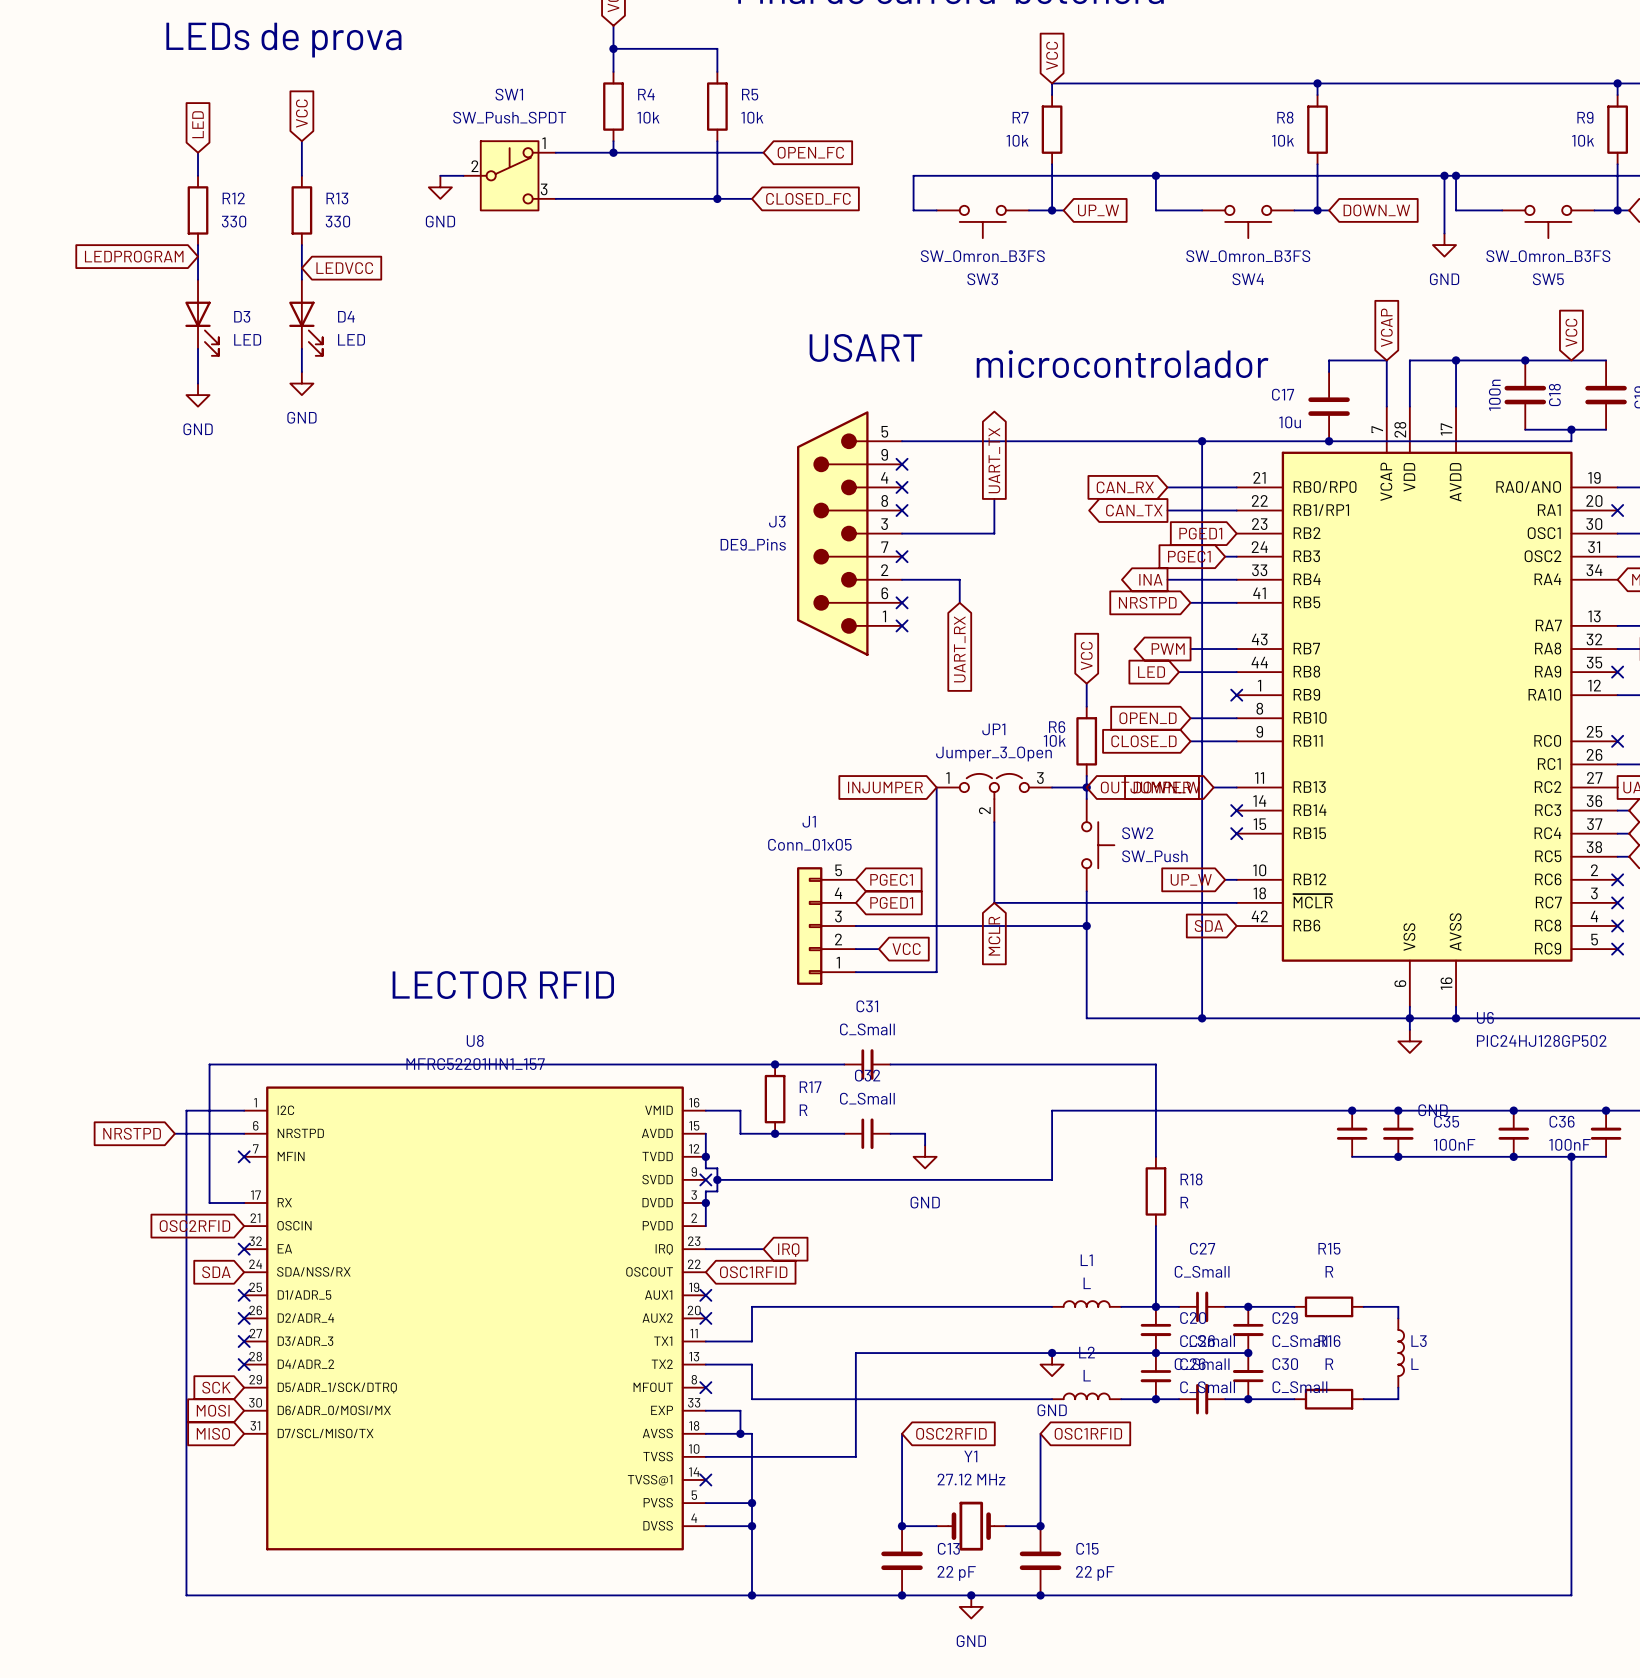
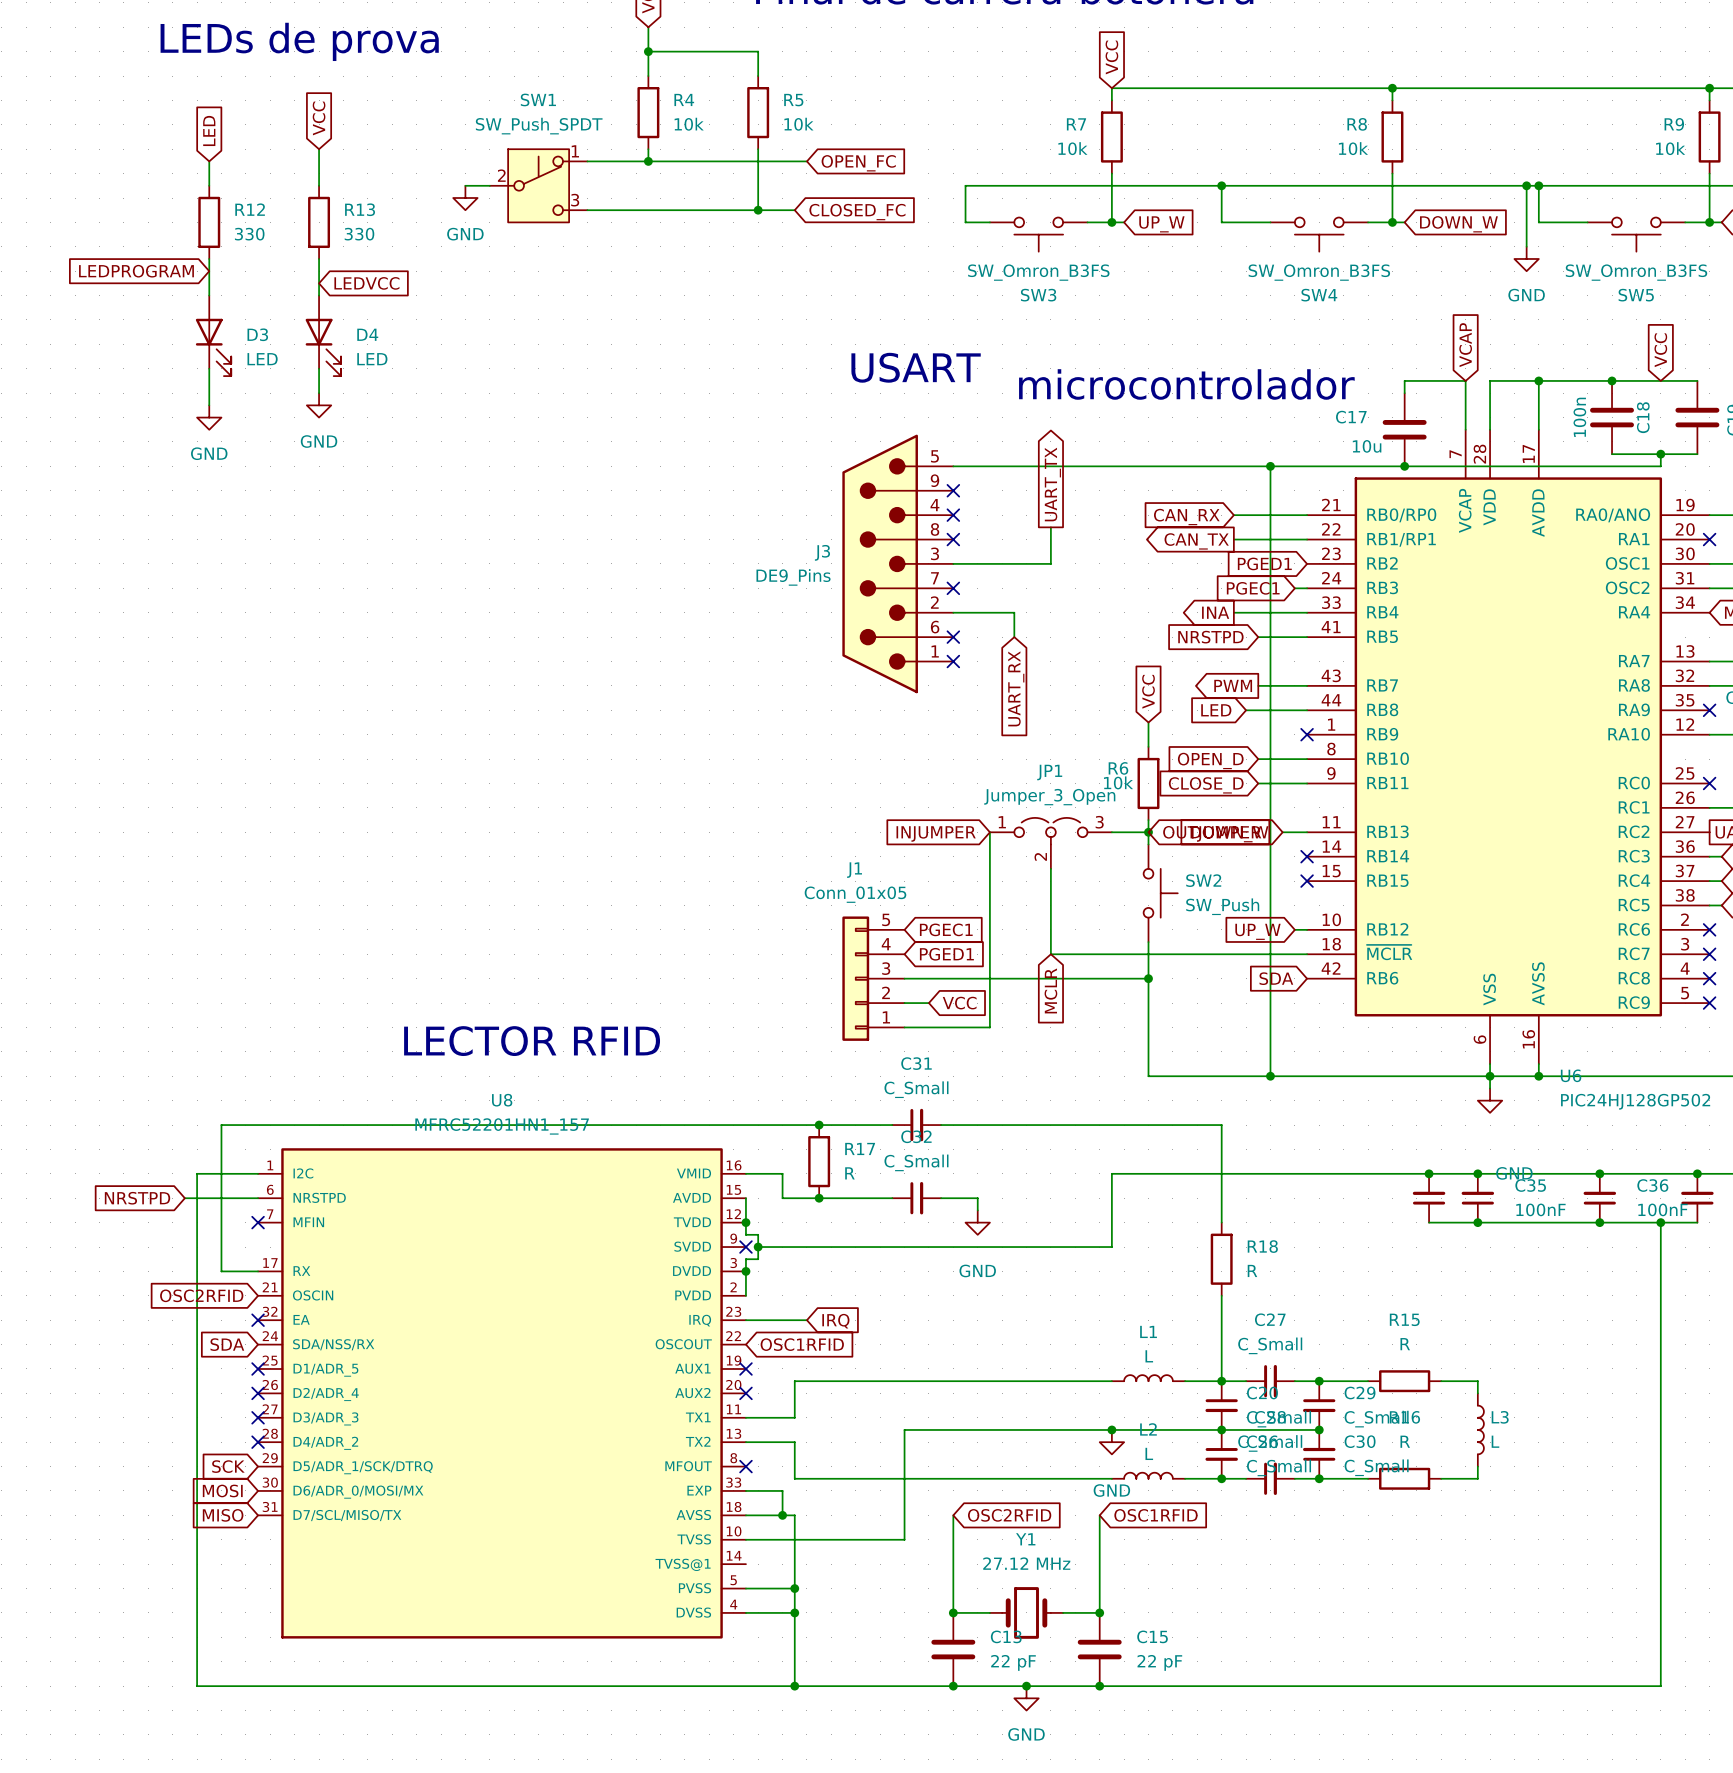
no-connect mark: (705, 1479) -> none

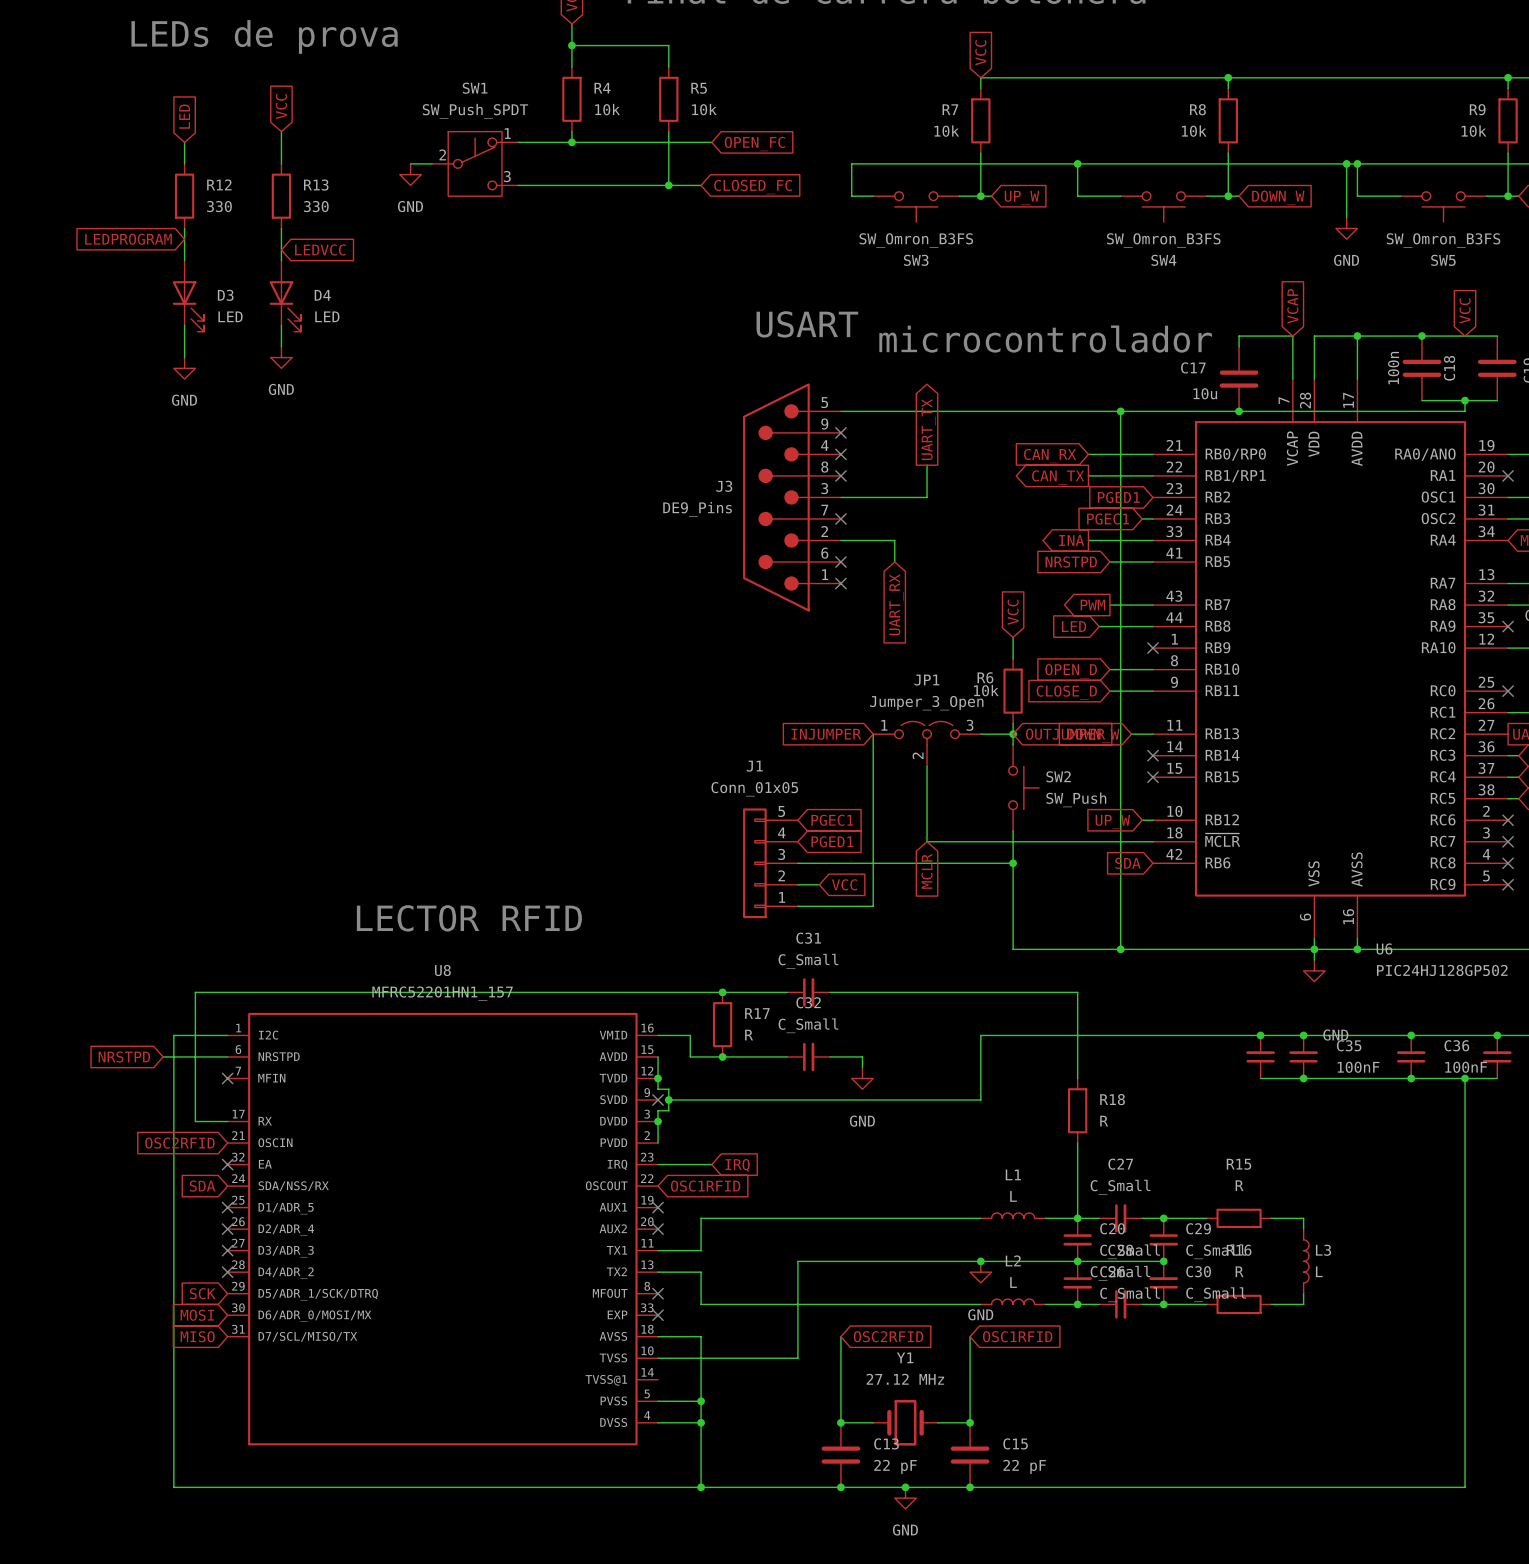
wire: (745, 1490) (782, 1490) (782, 1515) -> none
no-connect mark: none -> (658, 1315)
junction: (782, 1515) -> none

